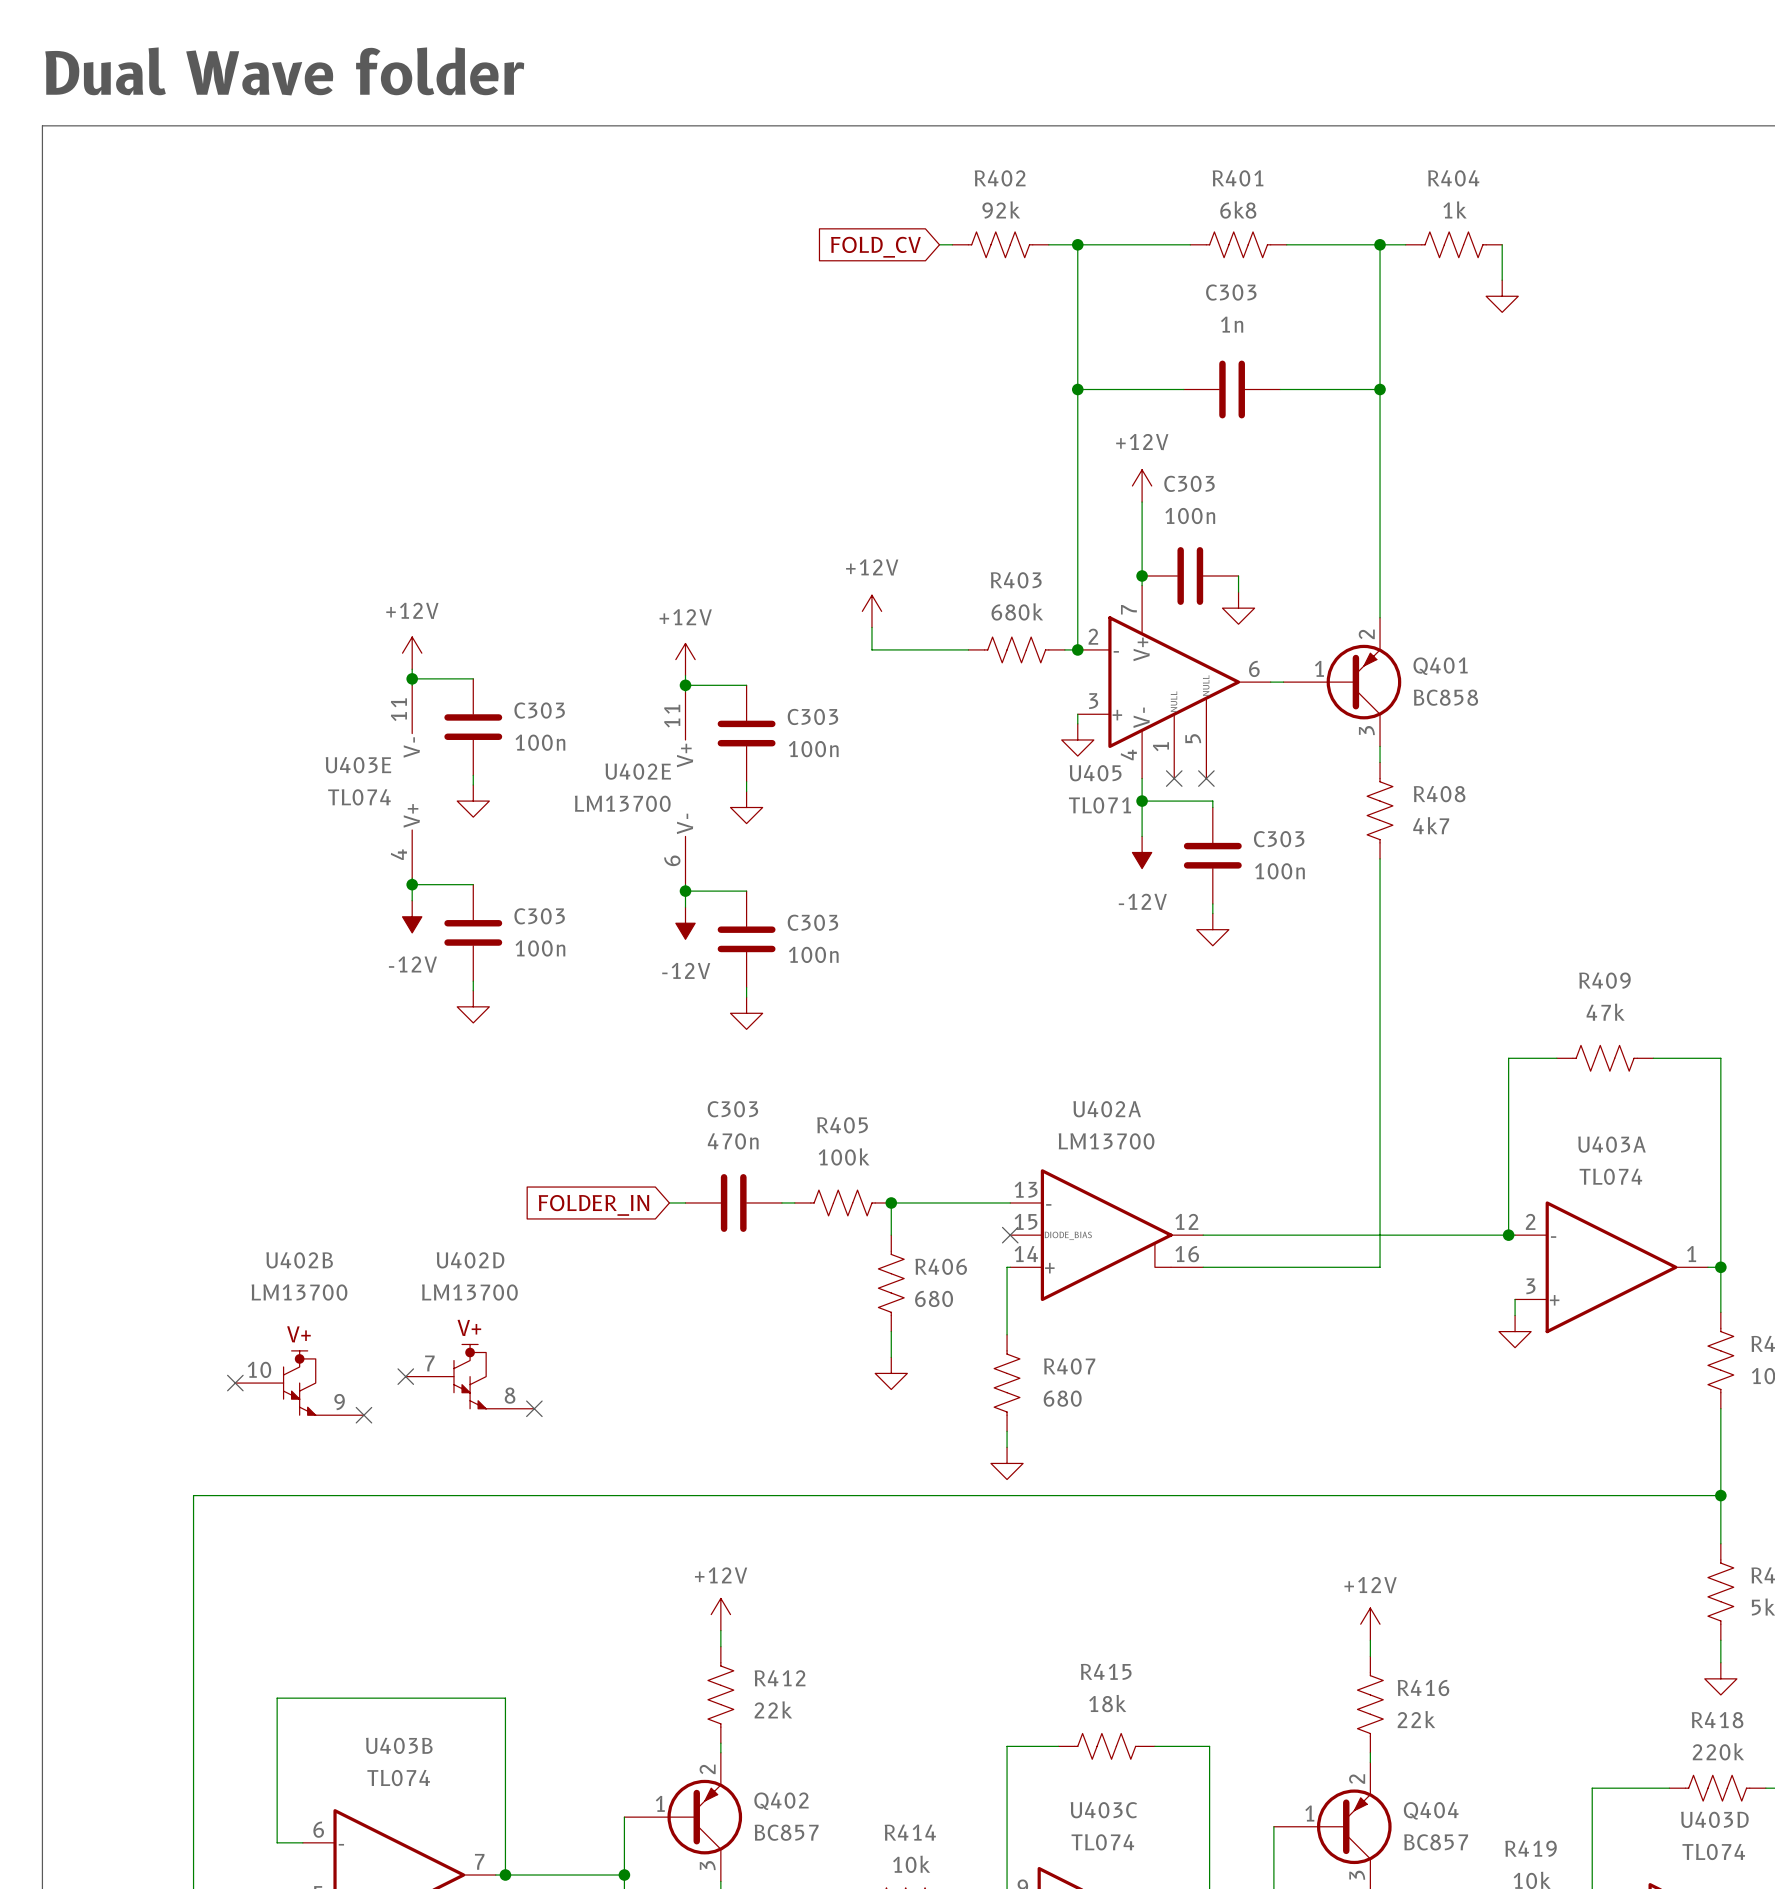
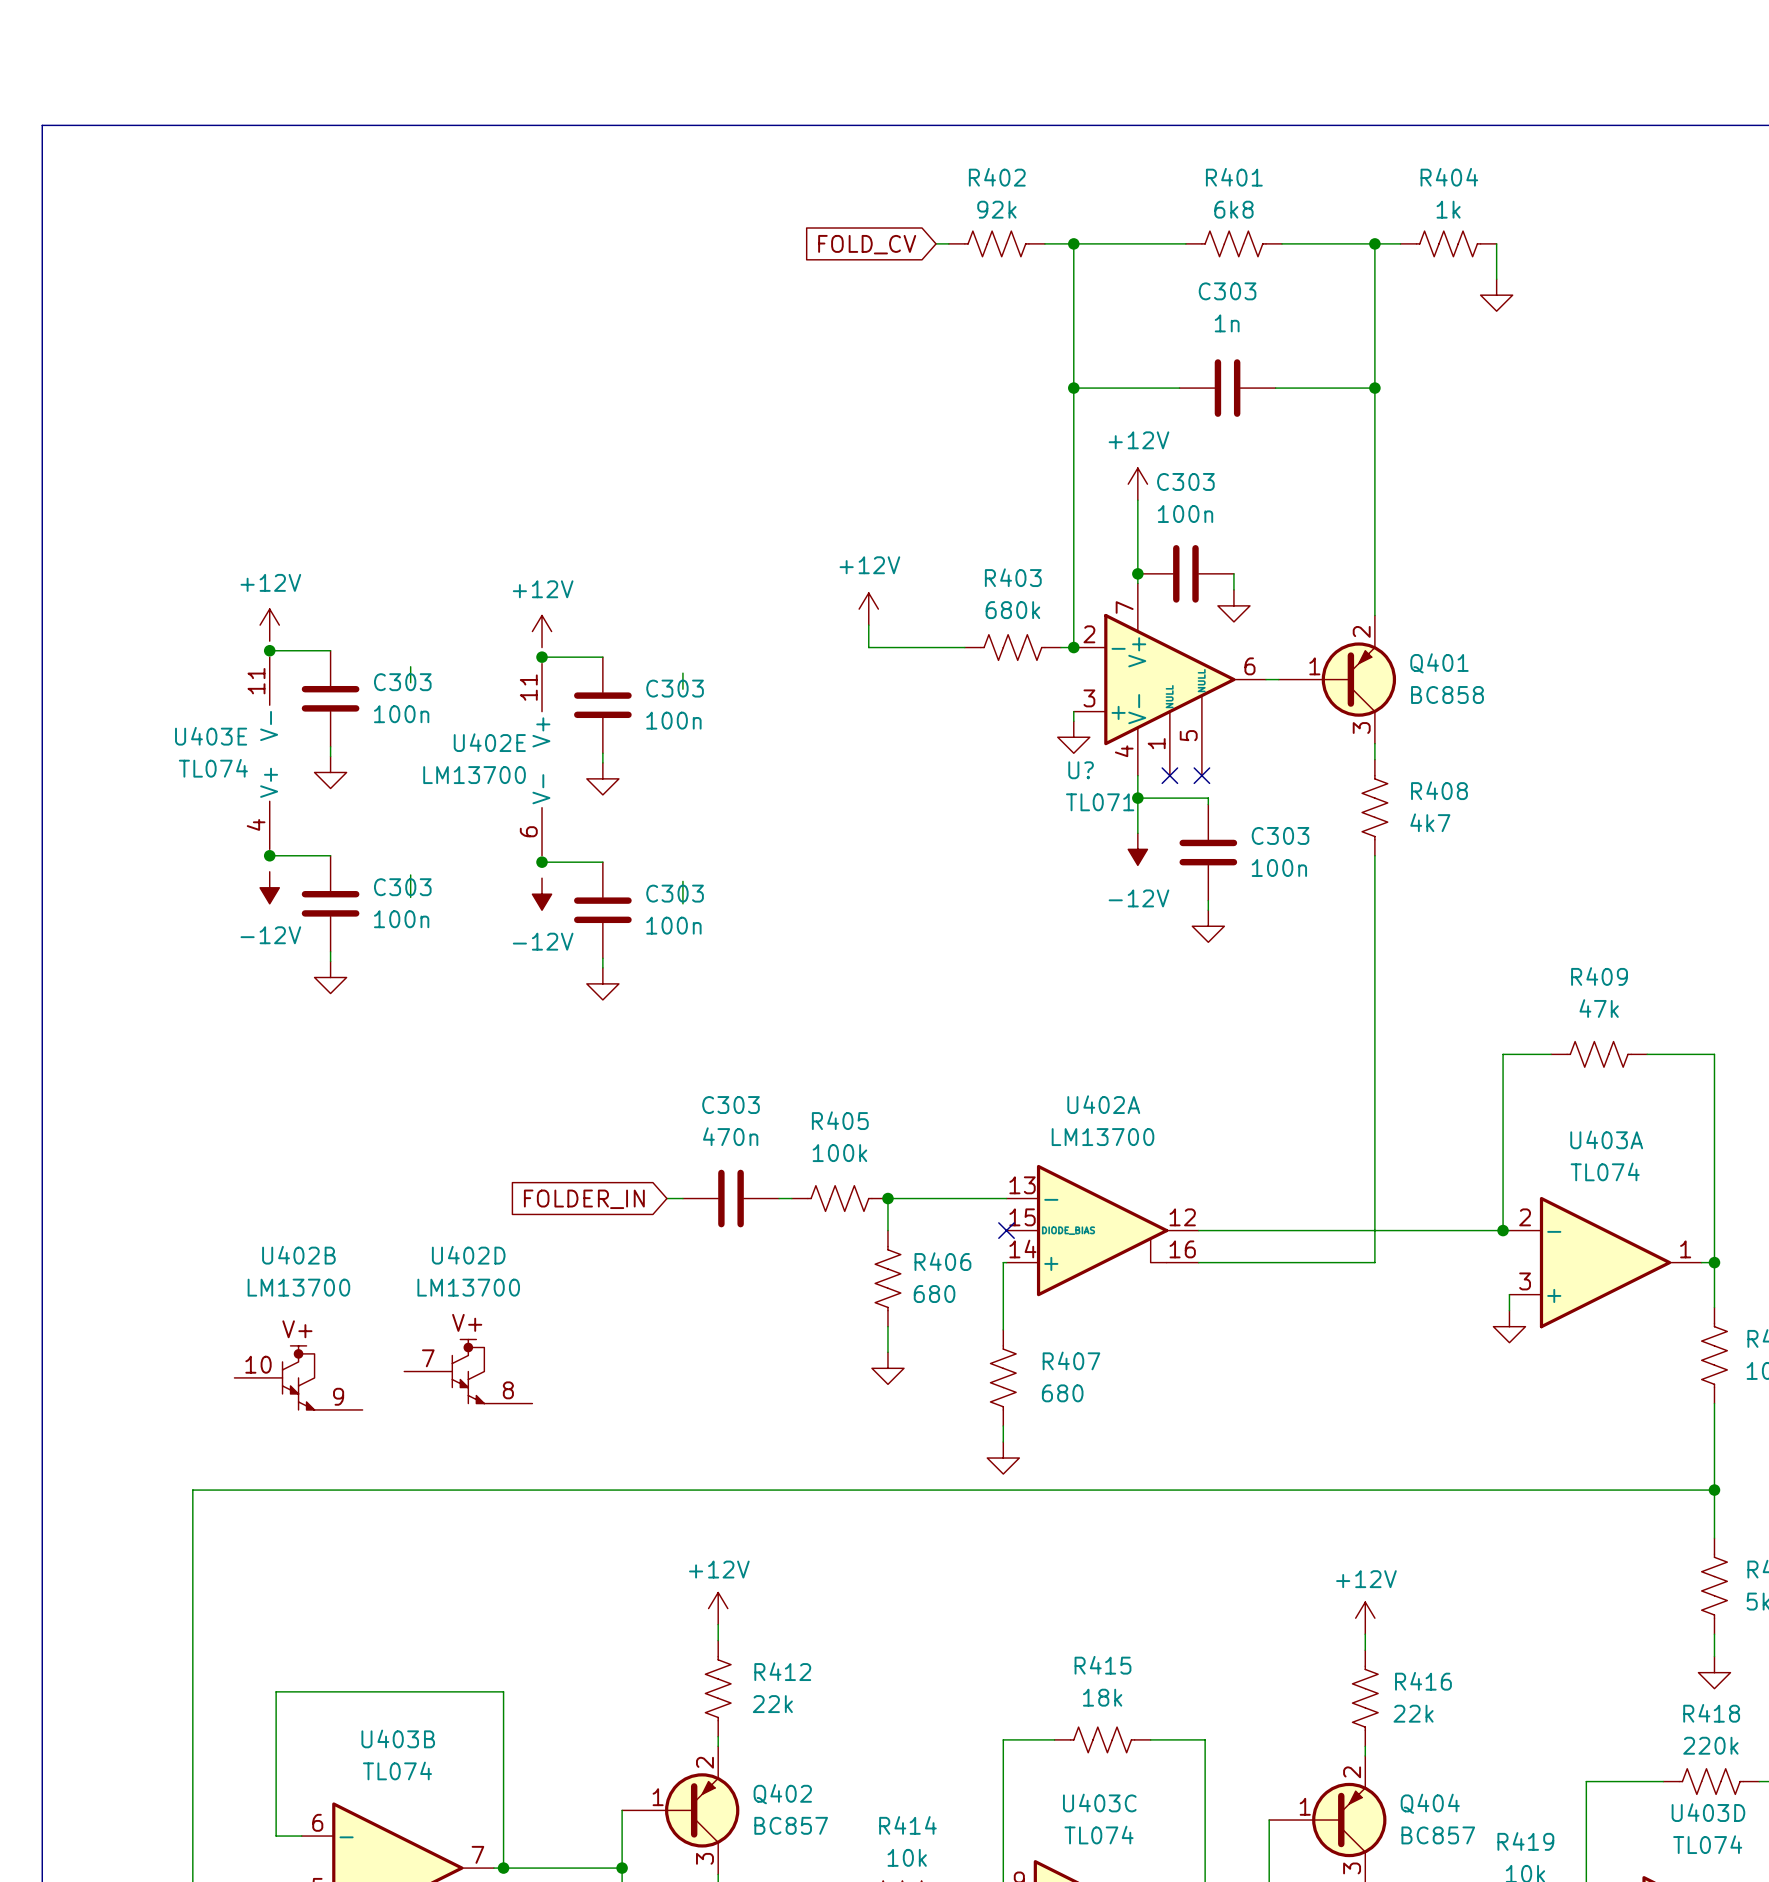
text: Dual Wave folder (284, 71) -> none
power symbol: none -> +12V (269, 625)
power symbol: none -> +12V (542, 631)
junction: none -> (269, 650)
power symbol: +12V (412, 653) -> none
junction: none -> (542, 657)
power symbol: +12V (685, 659) -> none
wire: (412, 678) (473, 678) -> (269, 650) (330, 650)
junction: (412, 678) -> none
wire: (685, 685) (746, 685) -> (542, 657) (602, 657)
junction: (685, 685) -> none
C303: none -> 100n (330, 698)
C303: none -> 100n (602, 705)
C303: 100n (473, 727) -> none
C303: 100n (746, 733) -> none
U405 name: U405 (1095, 773) -> U? (1081, 770)
power symbol: none -> (330, 772)
wire: (473, 775) (473, 784) -> (330, 746) (330, 756)
U403E position: (412, 781) -> (269, 753)
power symbol: none -> (602, 778)
wire: (746, 781) (746, 791) -> (602, 753) (602, 762)
U402E position: (685, 788) -> (542, 759)
power symbol: (473, 801) -> none
power symbol: (746, 807) -> none
junction: none -> (269, 855)
junction: none -> (542, 862)
wire: (412, 884) (473, 884) -> (269, 855) (330, 855)
junction: (412, 884) -> none
power symbol: none -> -12V (269, 887)
wire: (685, 891) (746, 891) -> (542, 862) (602, 862)
junction: (685, 891) -> none
power symbol: none -> -12V (542, 894)
C303: none -> 100n (330, 903)
C303: none -> 100n (602, 910)
power symbol: -12V (412, 916) -> none
power symbol: -12V (685, 923) -> none
C303: 100n (473, 932) -> none
C303: 100n (746, 939) -> none
power symbol: none -> (330, 977)
wire: (473, 981) (473, 990) -> (330, 951) (330, 961)
power symbol: none -> (602, 983)
wire: (746, 987) (746, 997) -> (602, 958) (602, 967)
power symbol: (473, 1006) -> none
power symbol: (746, 1013) -> none
no-connect mark: (405, 1376) -> none
no-connect mark: (235, 1383) -> none
no-connect mark: (534, 1408) -> none
no-connect mark: (363, 1415) -> none

